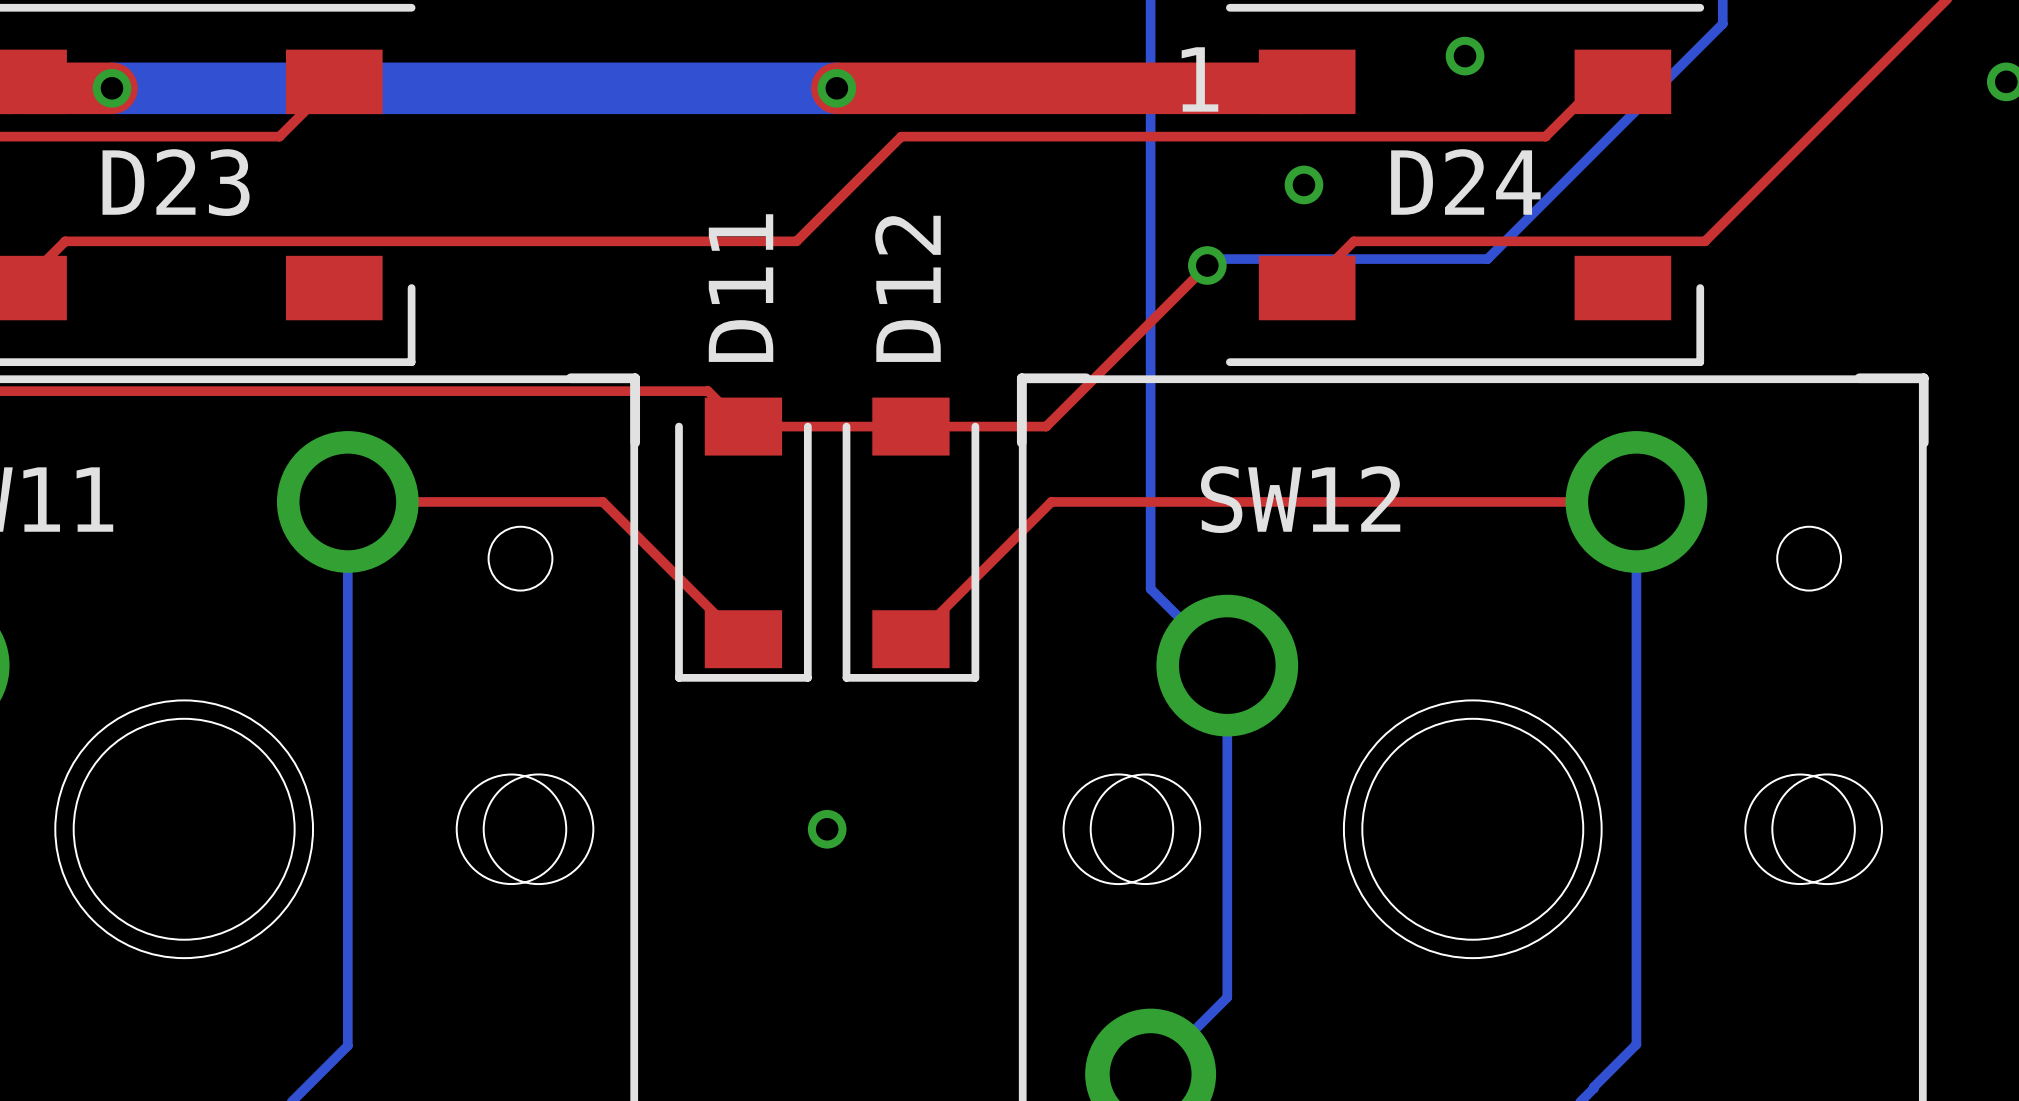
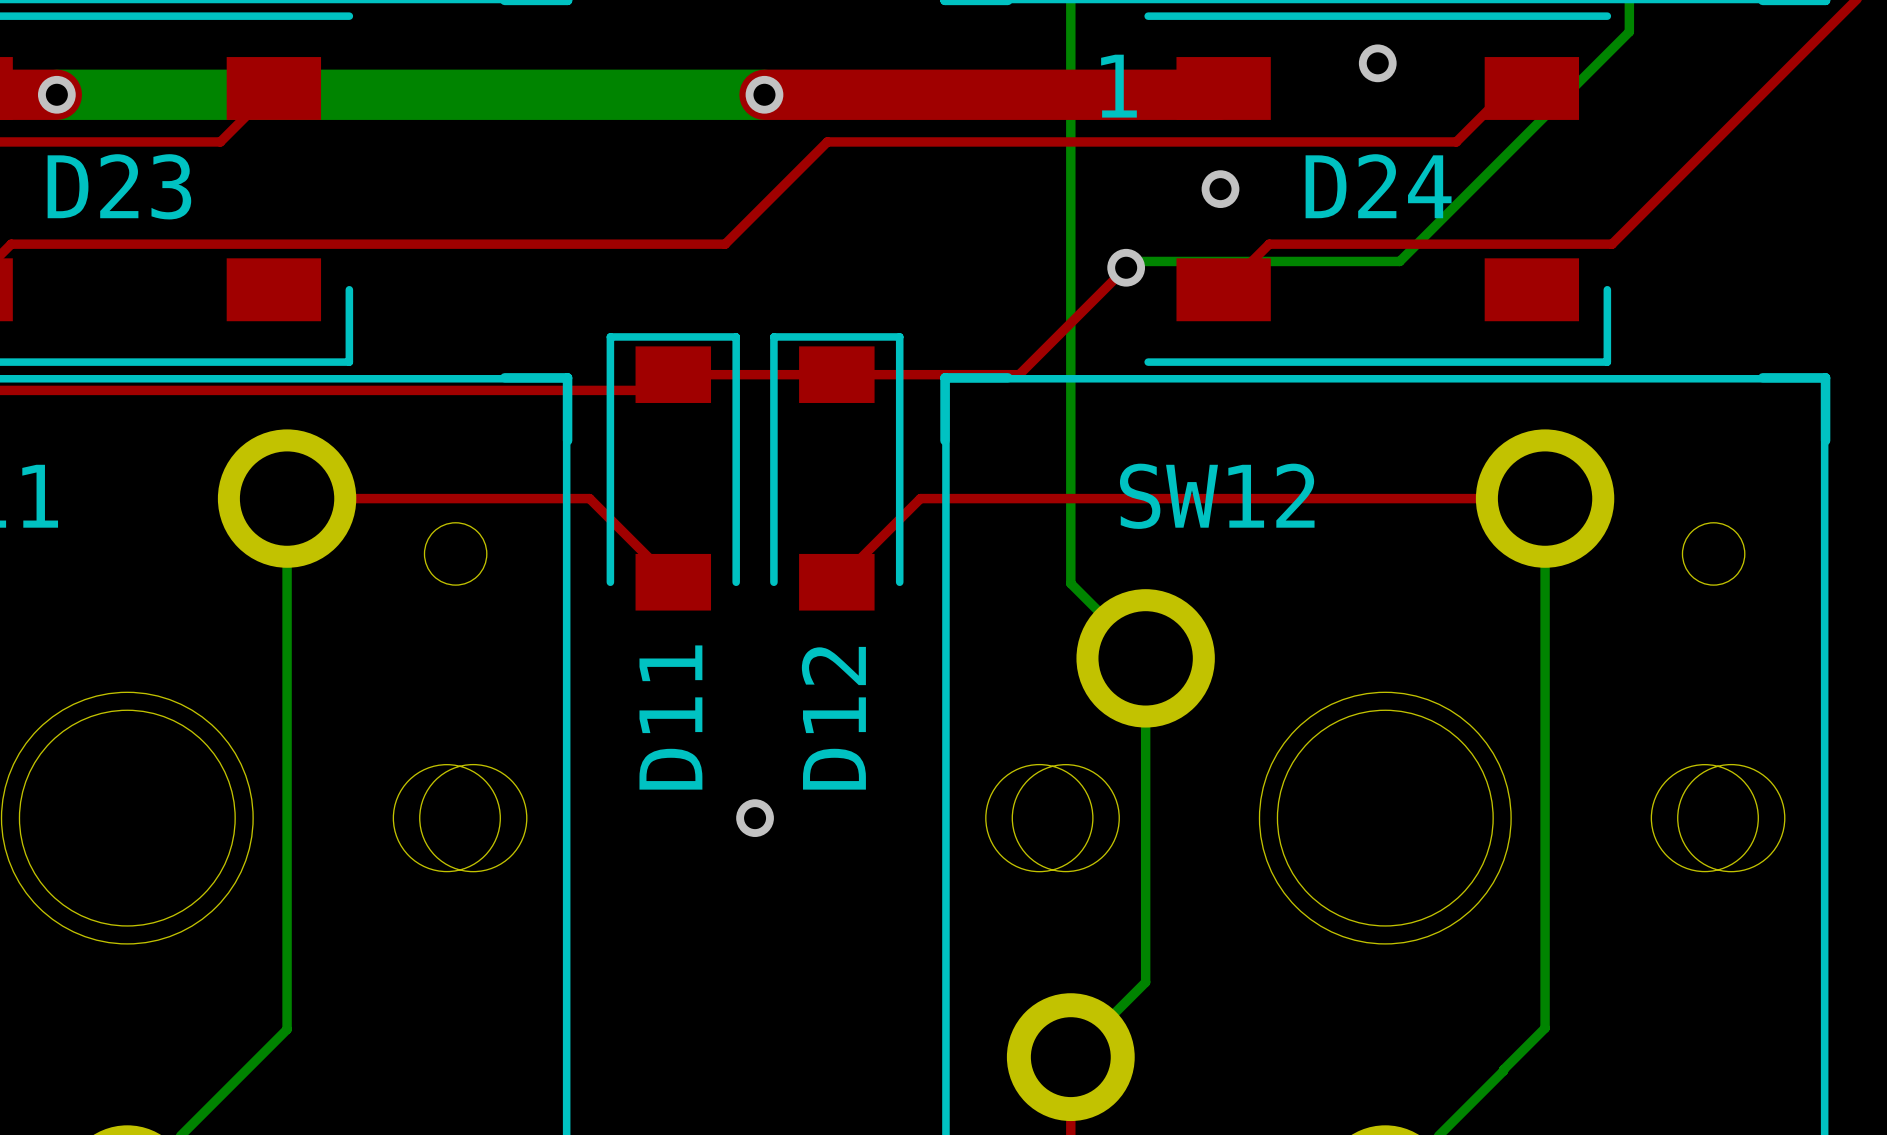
top track: (1097, 375) (1046, 426) (743, 426) (707, 391) -> (1019, 374) (673, 374) (657, 390) (638, 390)
top track: (602, 501) (740, 639) (743, 639) -> (536, 498) (589, 498) (673, 582)
top track: (1051, 501) (914, 639) (910, 639) -> (973, 498) (920, 498) (836, 582)
D11 rotation: 0° (743, 539) -> 180° (673, 471)
D12 rotation: 0° (910, 539) -> 180° (836, 471)

